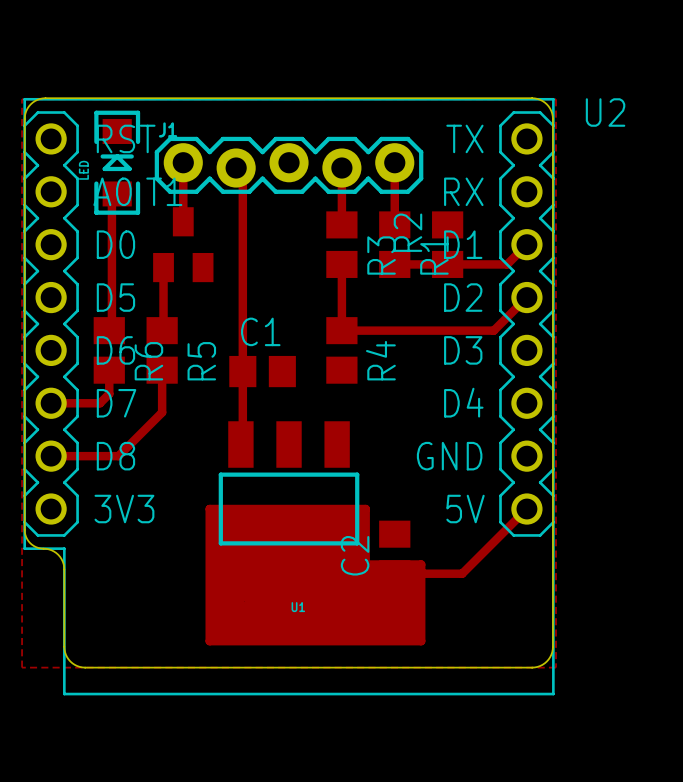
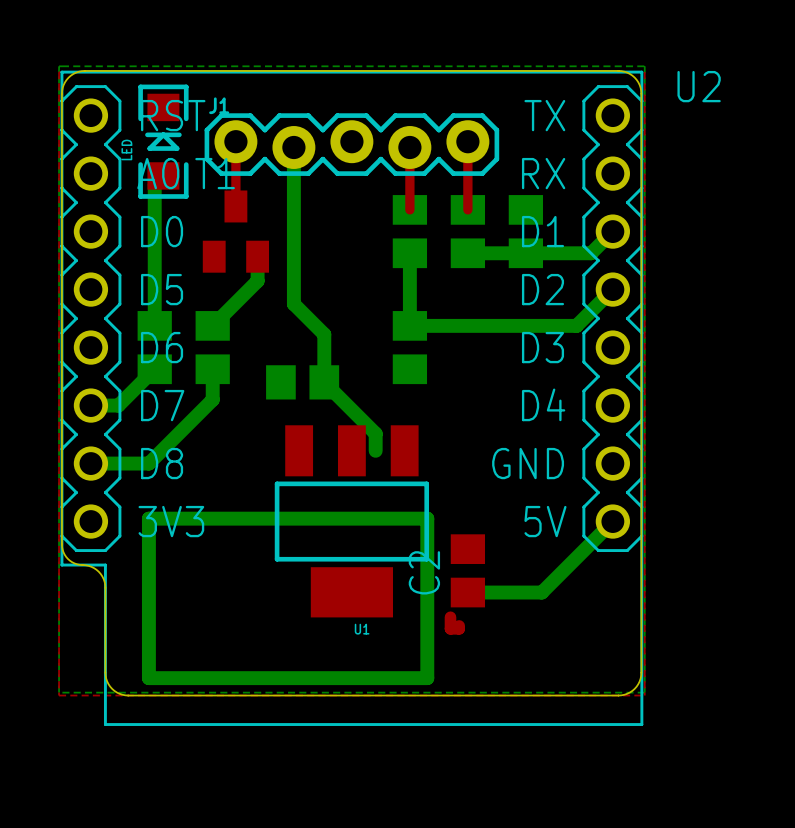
bottom zone outline: none -> (59, 66) (644, 66) (644, 692) (59, 692) (59, 66)
top track: (236, 168) (242, 174) (242, 442) (240, 444) -> none
bottom track: none -> (293, 147) (293, 304) (324, 334) (324, 382) (375, 433) (375, 450)
top track: (117, 193) (111, 199) (111, 327) (109, 330) -> none
bottom track: none -> (157, 181) (163, 175) (154, 184) (154, 325) (157, 322)
R3 side: top (341, 244) -> bottom (409, 231)
R1 side: top (394, 244) -> bottom (467, 231)
R2 side: top (447, 244) -> bottom (525, 231)
top track: (526, 244) (507, 264) (394, 264) -> none
bottom track: none -> (612, 231) (591, 253) (467, 253)
top track: (341, 264) (341, 330) (493, 330) (526, 297) -> none
bottom track: none -> (409, 253) (409, 325) (576, 325) (612, 289)
top track: (163, 267) (163, 329) -> none
bottom track: none -> (257, 256) (257, 280) (212, 325) (220, 318)
R6 side: top (109, 350) -> bottom (154, 347)
R5 side: top (162, 350) -> bottom (212, 347)
R4 side: top (341, 350) -> bottom (409, 347)
top track: (109, 370) (109, 393) (99, 403) (51, 403) -> none
bottom track: none -> (154, 369) (118, 405) (90, 405)
top track: (162, 370) (162, 412) (118, 456) (51, 456) -> none
bottom track: none -> (212, 369) (212, 399) (148, 463) (90, 463)
C1 side: top (262, 371) -> bottom (302, 382)
bottom track: none -> (148, 518) (148, 678) (427, 678) (427, 518) (148, 518)
top track: (209, 509) (209, 641) (421, 641) (421, 564) (365, 564) (365, 509) (209, 509) -> none
top track: (526, 509) (462, 573) (394, 573) -> none
bottom track: none -> (612, 521) (541, 592) (467, 592)
top track: (215, 514) (363, 514) (363, 569) (415, 569) (415, 633) (217, 633) (217, 522) (355, 522) (355, 627) (407, 627) (407, 580) (363, 580) (363, 620) (400, 620) (400, 588) -> none
top track: (222, 527) (222, 530) (349, 530) (349, 625) (225, 625) (225, 538) (341, 538) (341, 617) (233, 617) (233, 546) (336, 546) (336, 606) (238, 606) (238, 553) (252, 553) -> none
top track: (249, 553) (249, 598) (328, 598) (328, 553) (326, 553) -> none
top track: (402, 588) (370, 588) (370, 612) (392, 612) (392, 596) (376, 596) -> none

